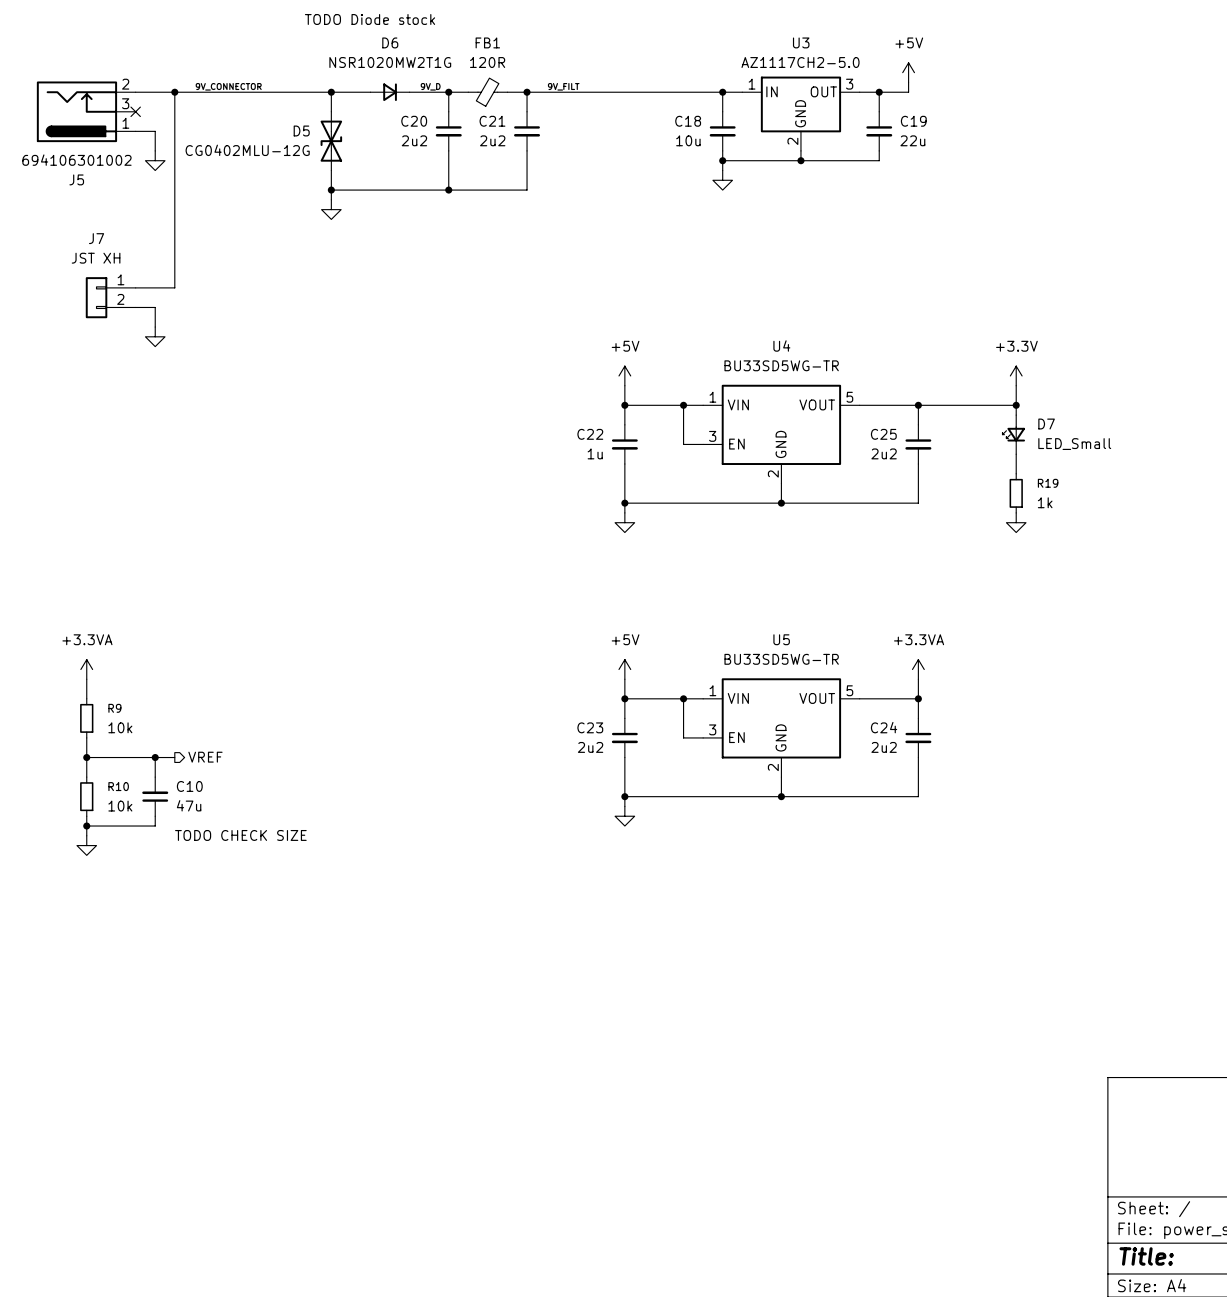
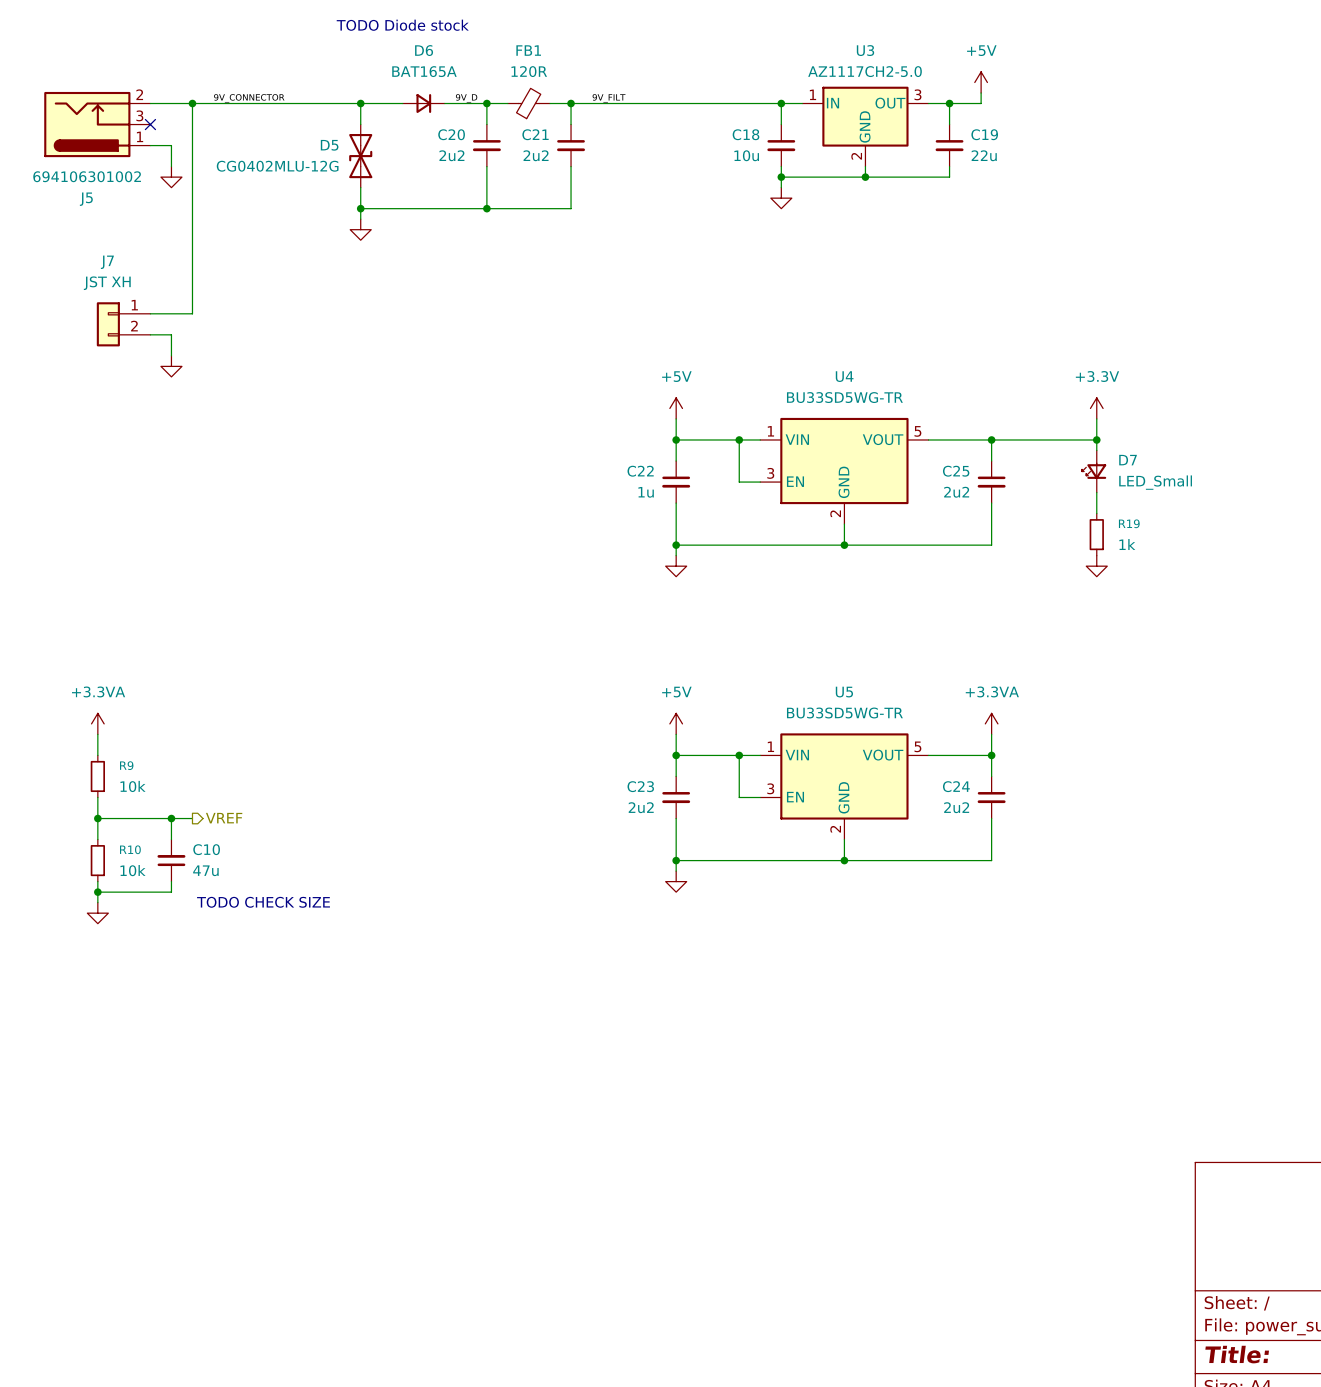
D6 value: NSR1020MW2T1G (390, 62) -> BAT165A (424, 71)

